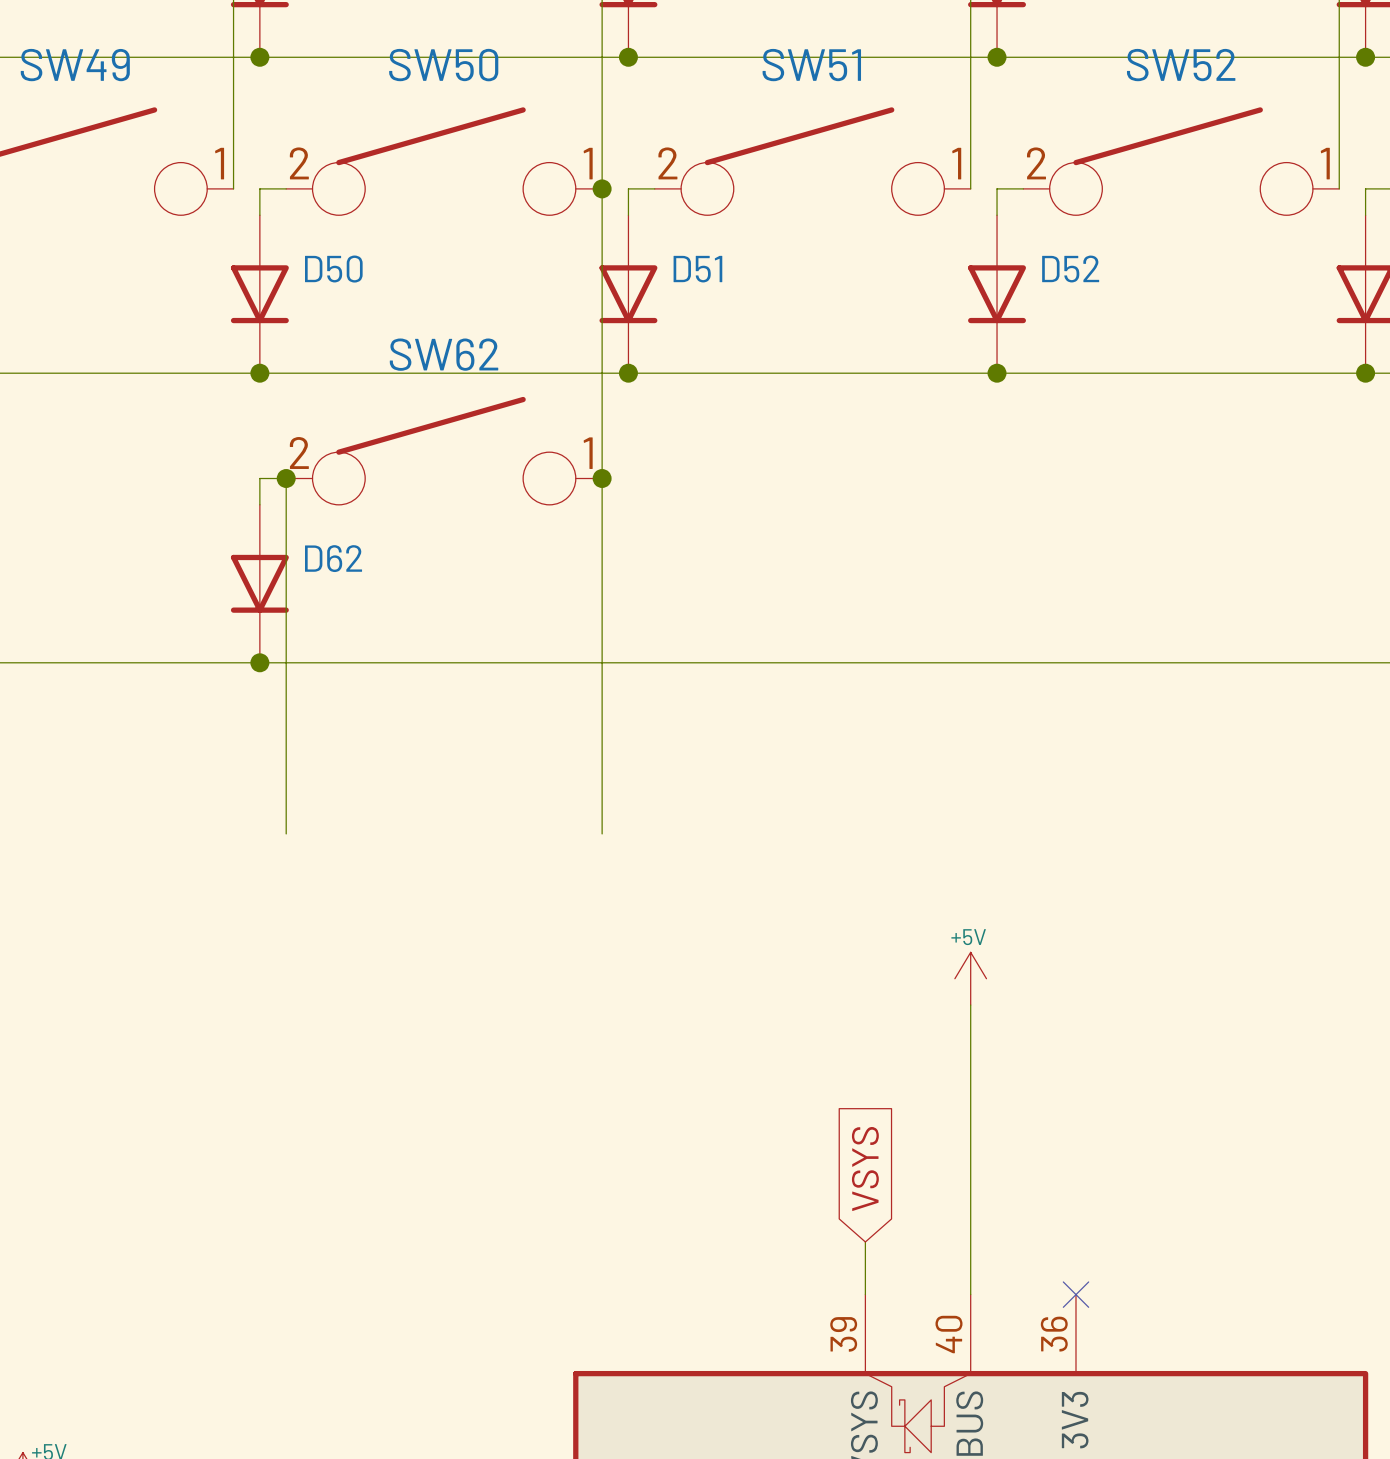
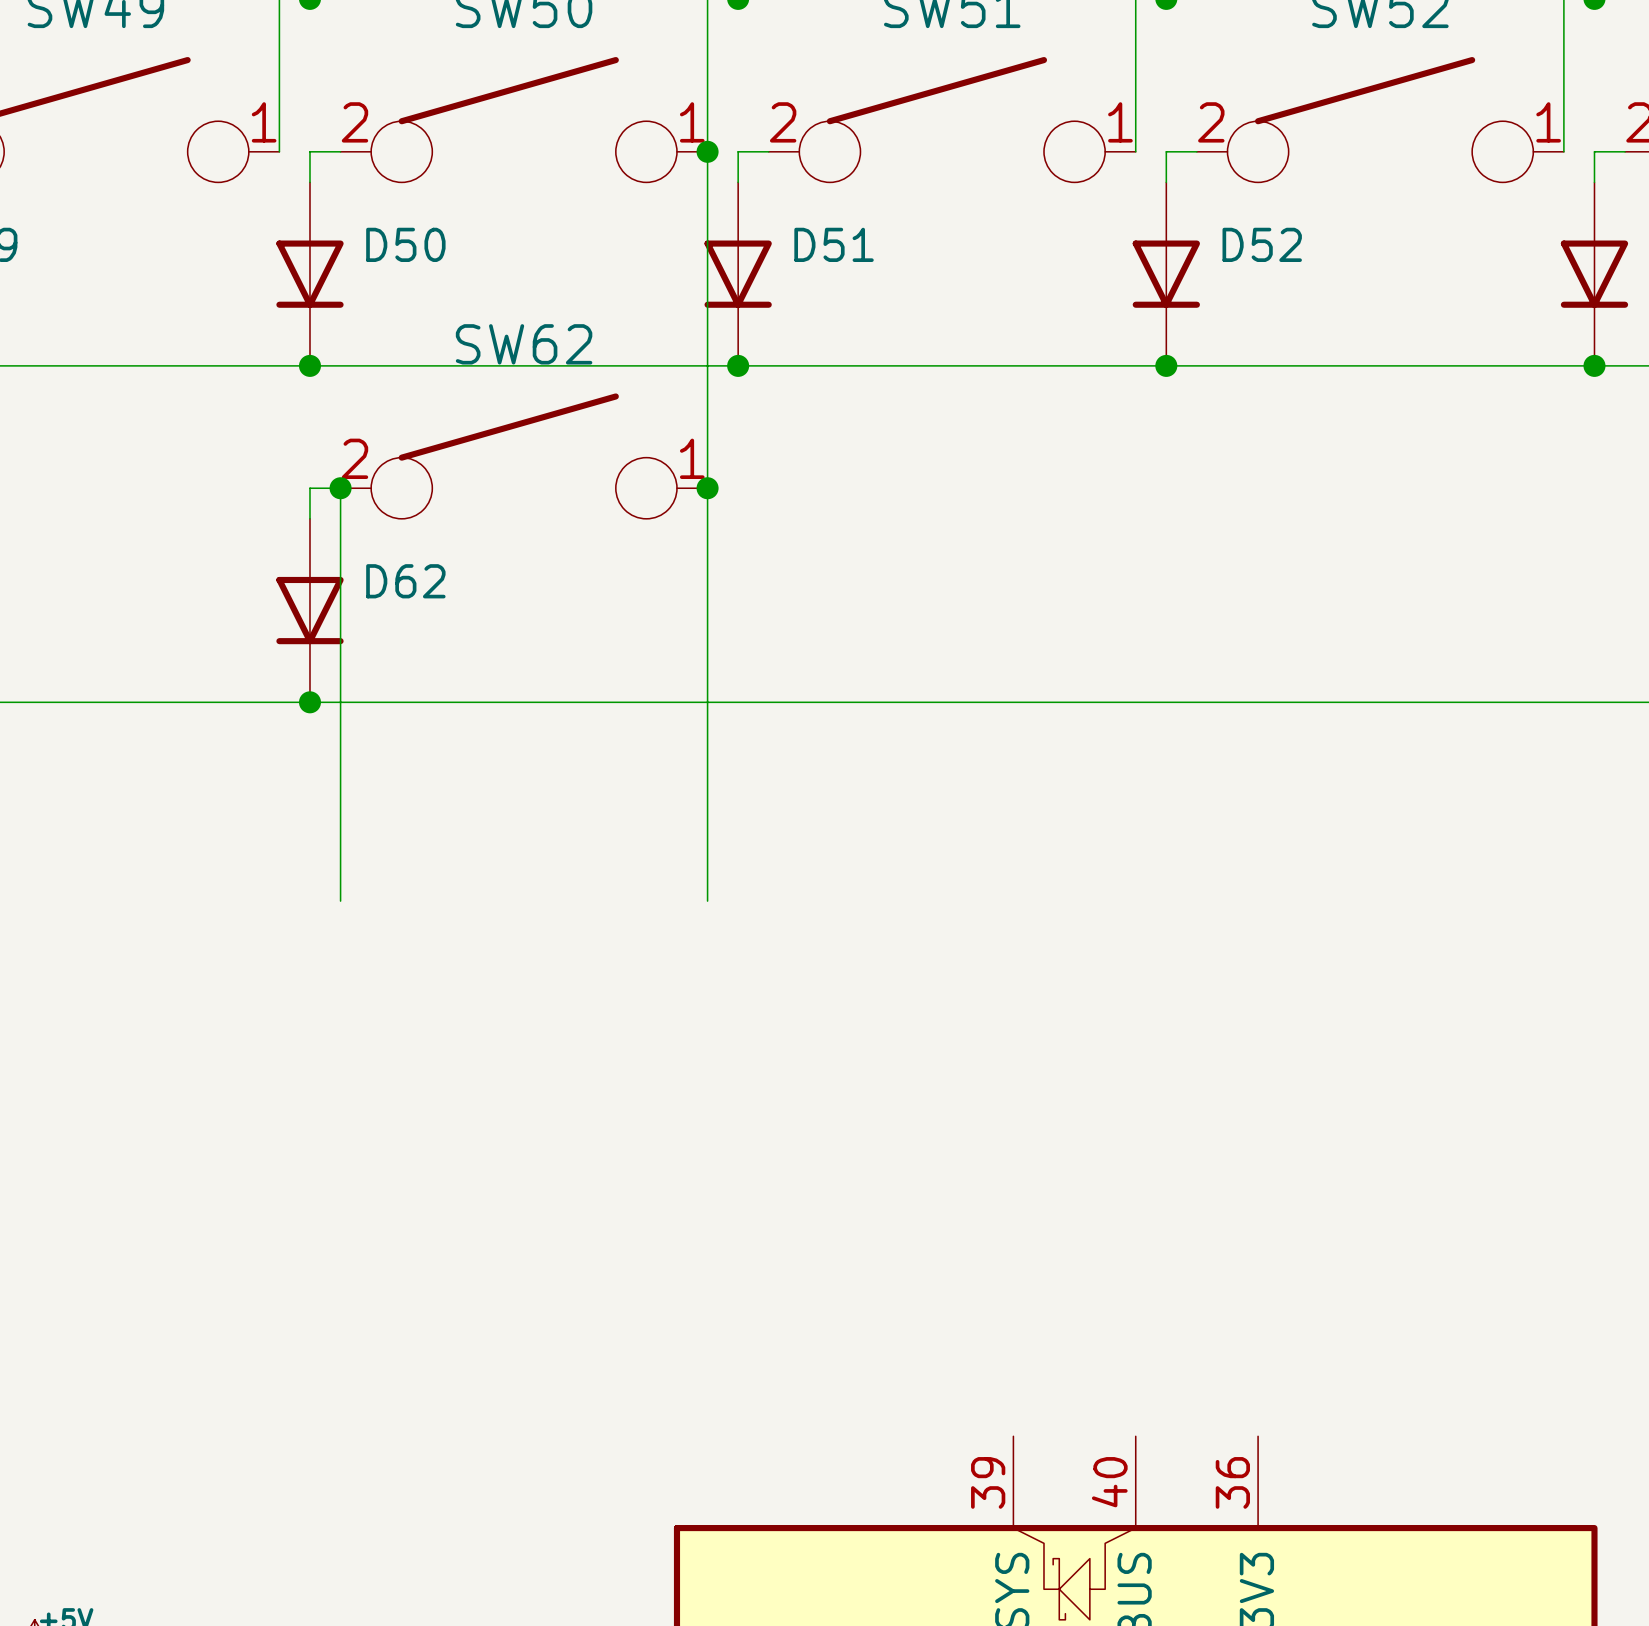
power symbol: +5V (970, 978) -> none
wire: (970, 1005) (970, 1294) -> none
global label: VSYS (865, 1169) -> none
wire: (865, 1241) (865, 1294) -> none
no-connect mark: (1075, 1294) -> none

